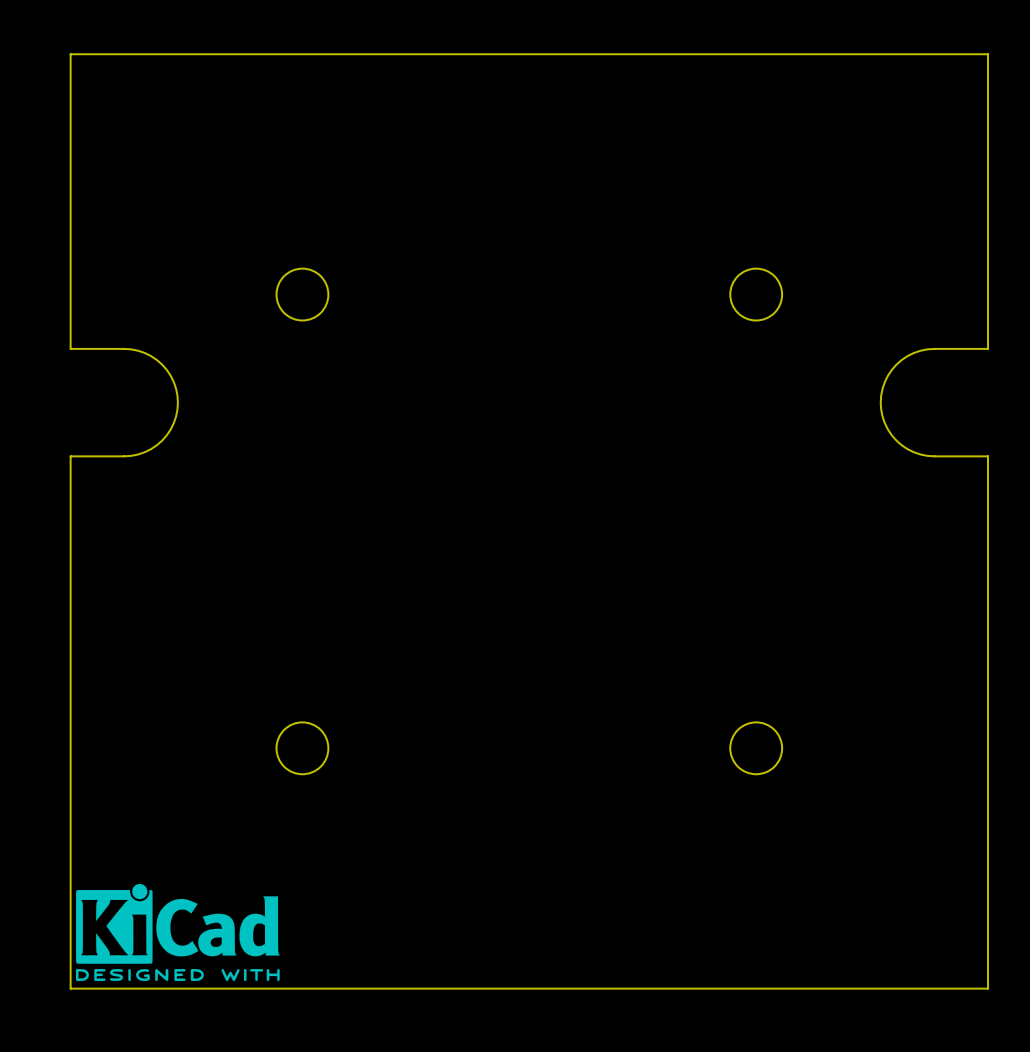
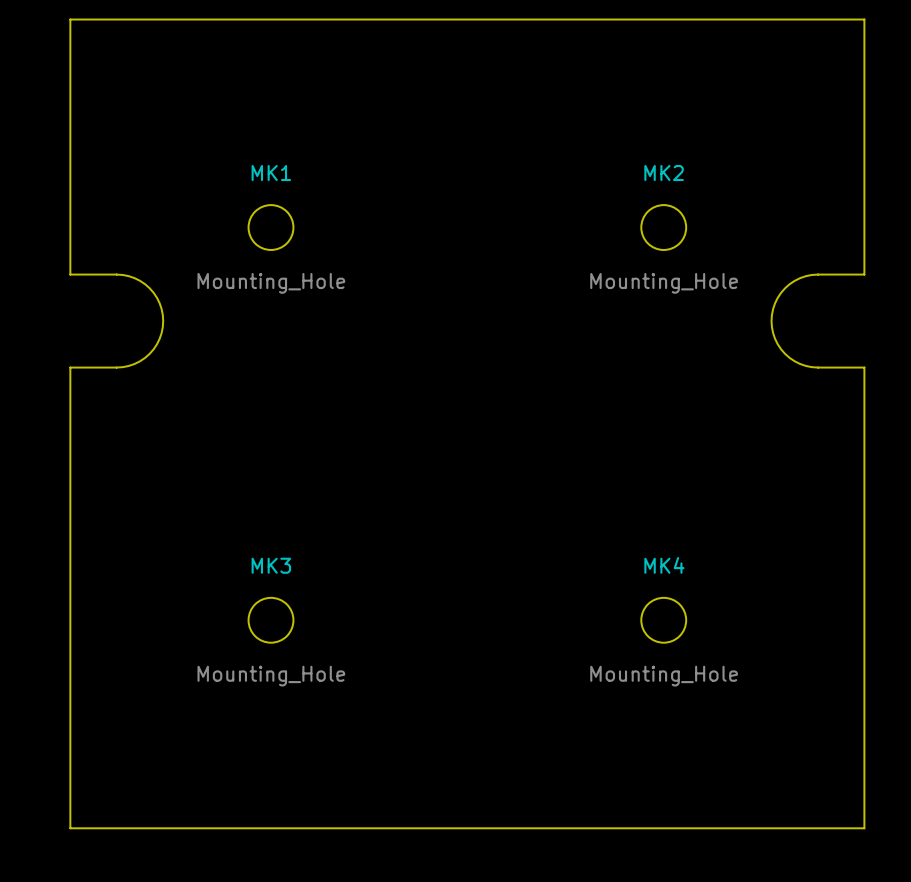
MK1 name: none -> MK1 (271, 173)
MK2 name: none -> MK2 (664, 173)
MK1 value: none -> Mounting_Hole (271, 283)
MK2 value: none -> Mounting_Hole (664, 283)
MK4 name: none -> MK4 (664, 565)
MK3 name: none -> MK3 (271, 565)
MK3 value: none -> Mounting_Hole (271, 676)
MK4 value: none -> Mounting_Hole (664, 676)
drawing: [75, 883, 280, 982] -> none

